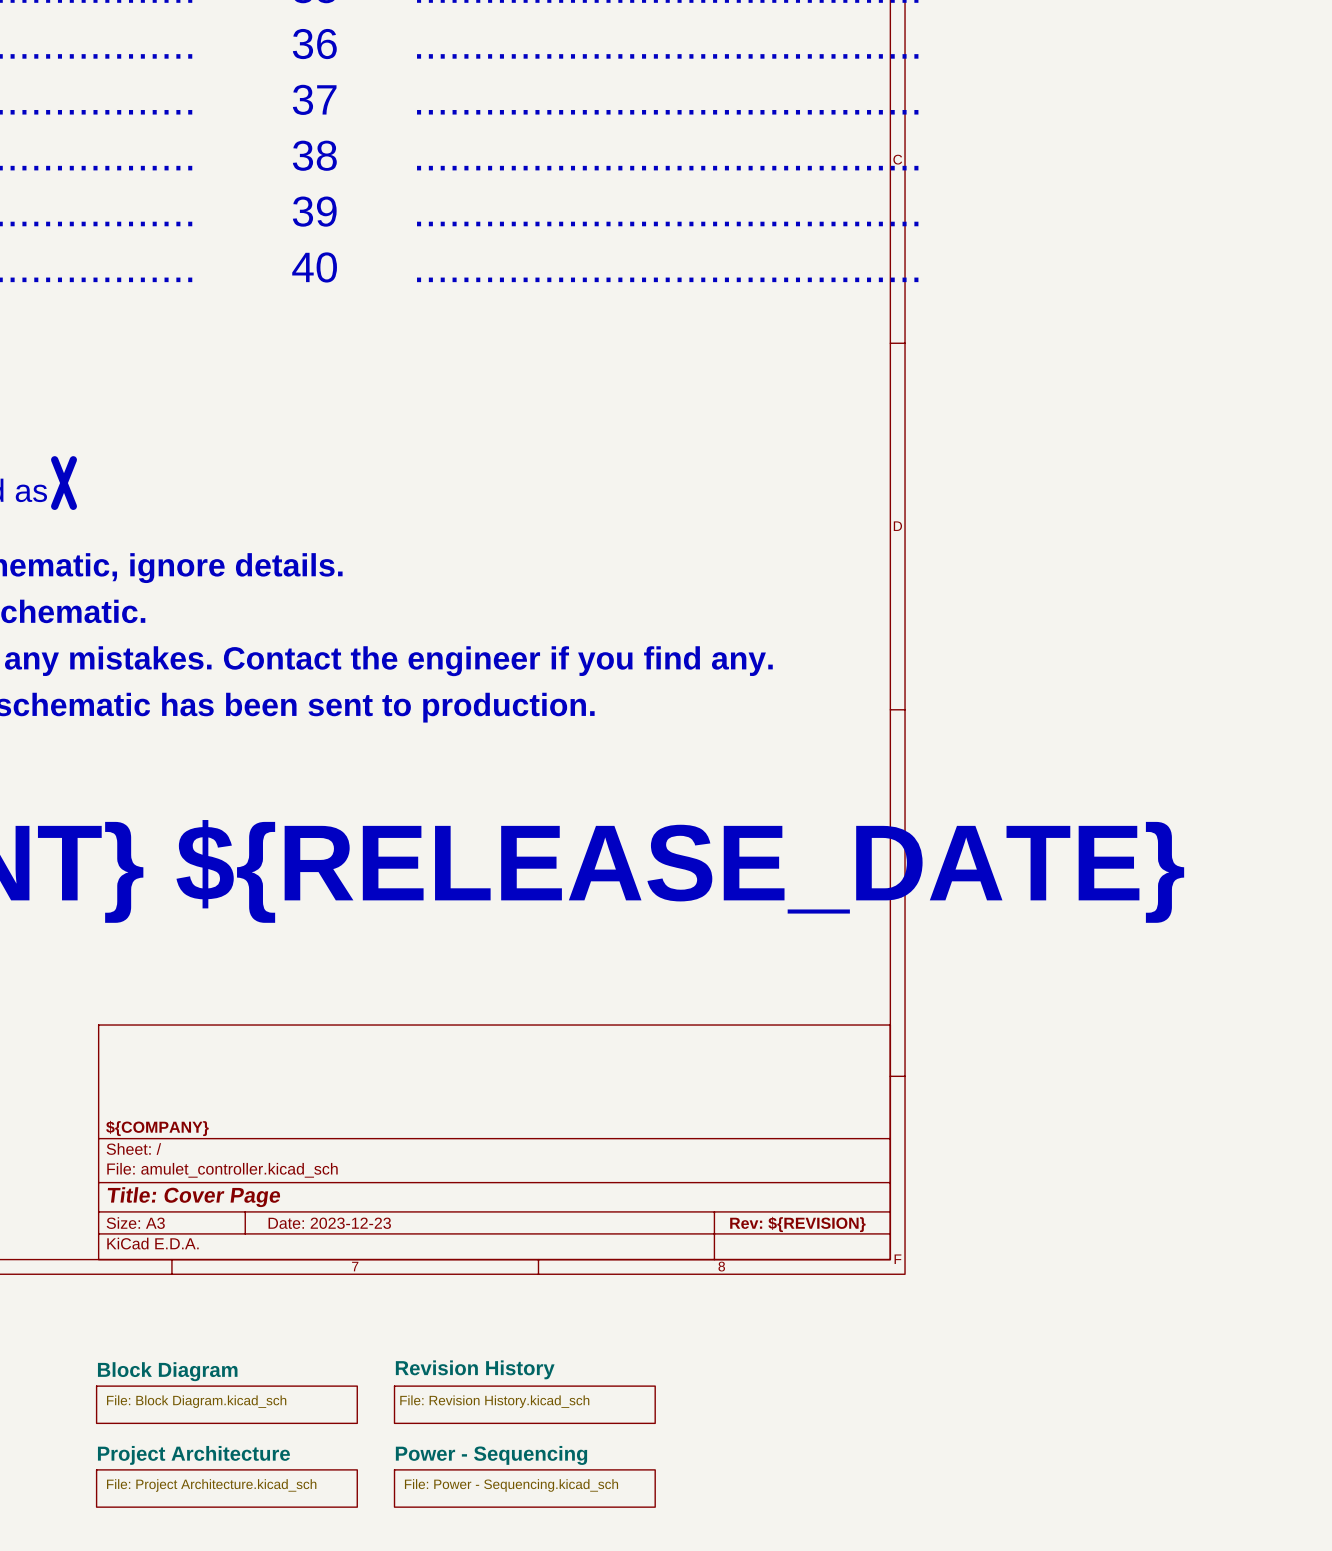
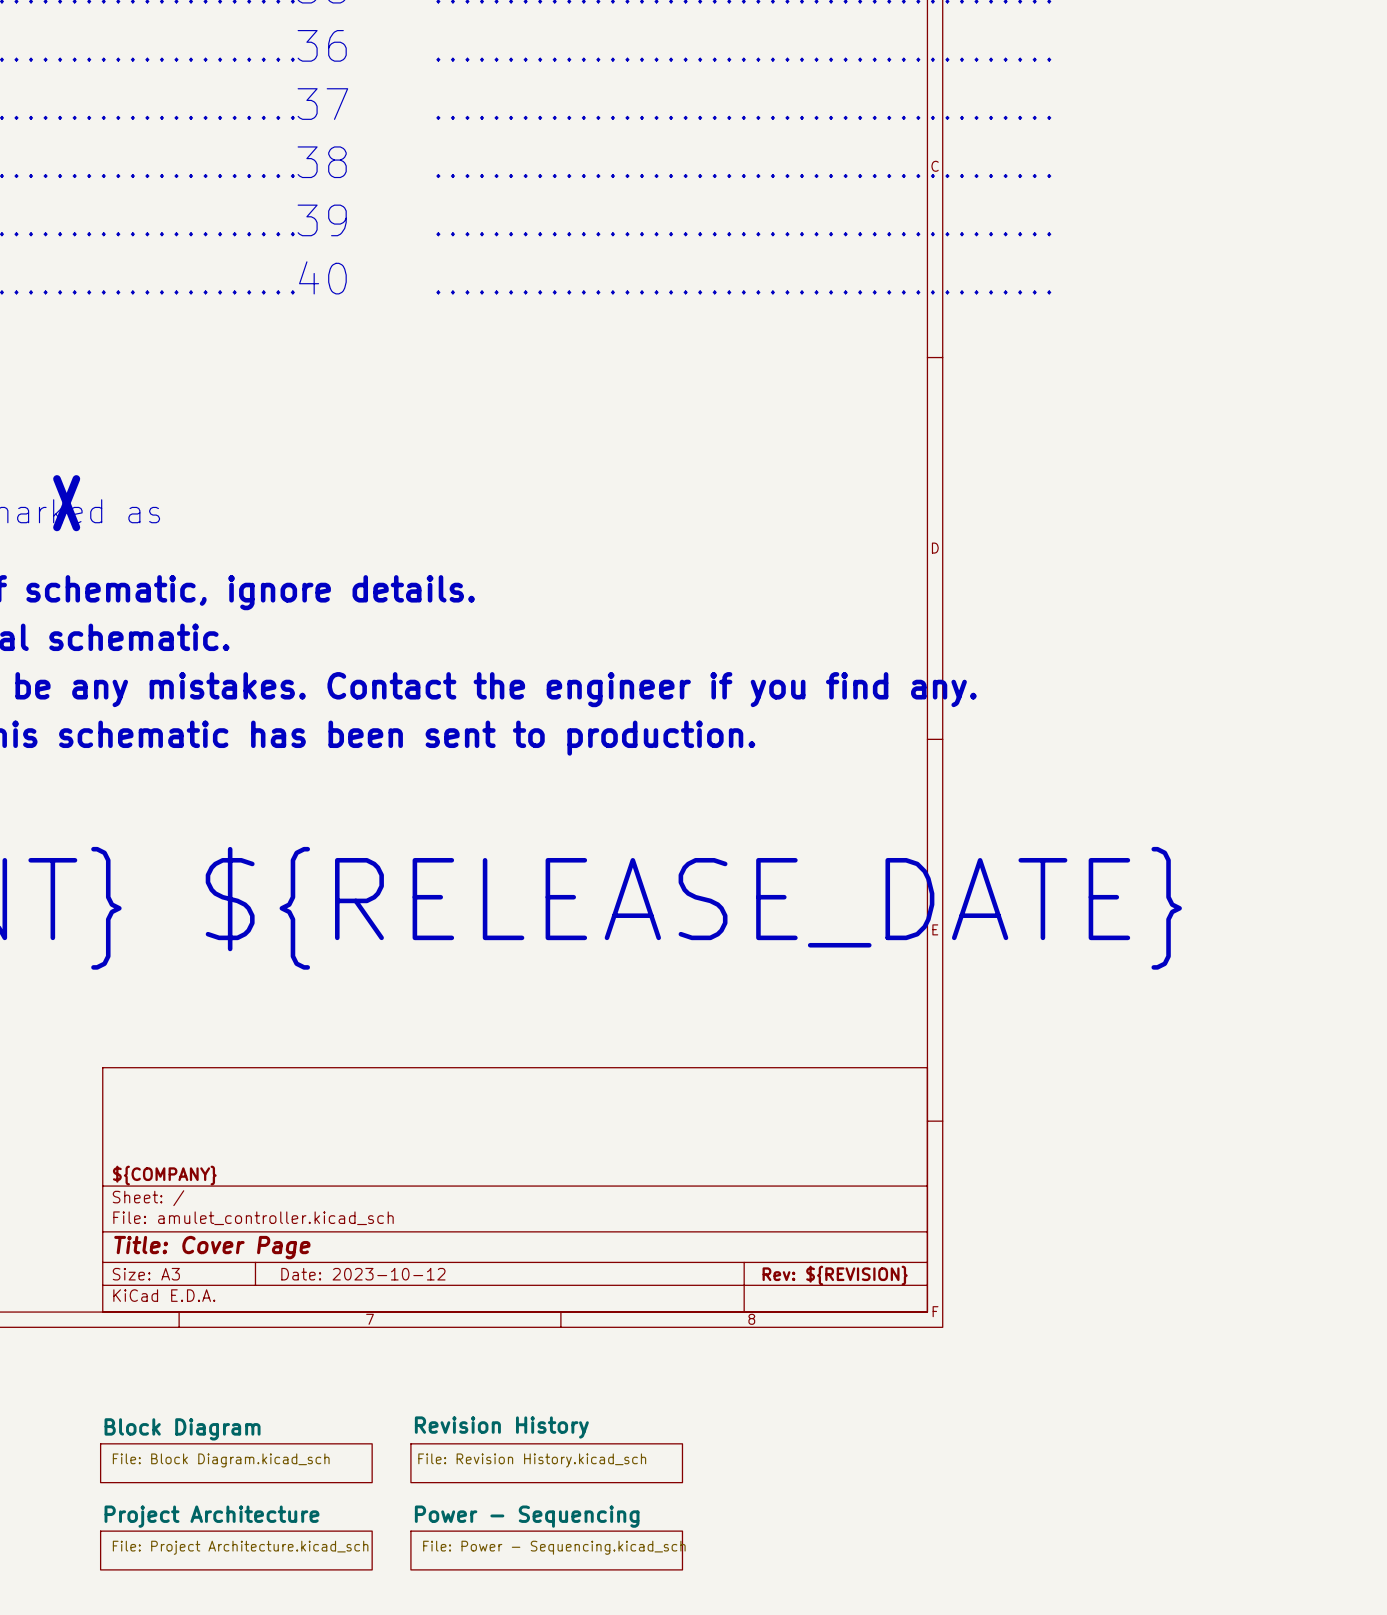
title block: Date: 2023-12-23 (329, 1223) -> Date: 2023-10-12 (363, 1274)

